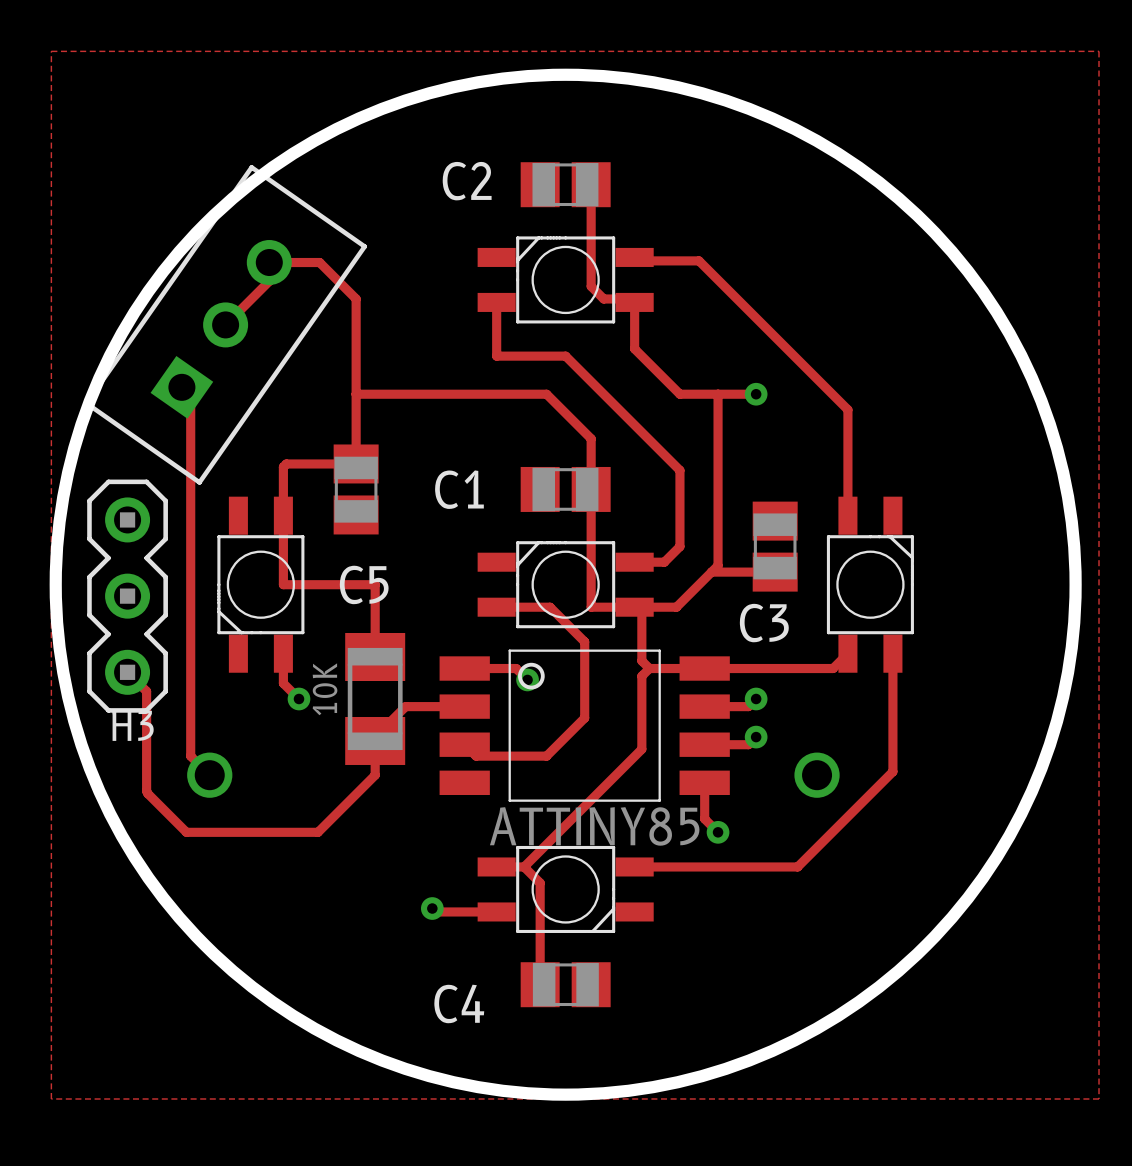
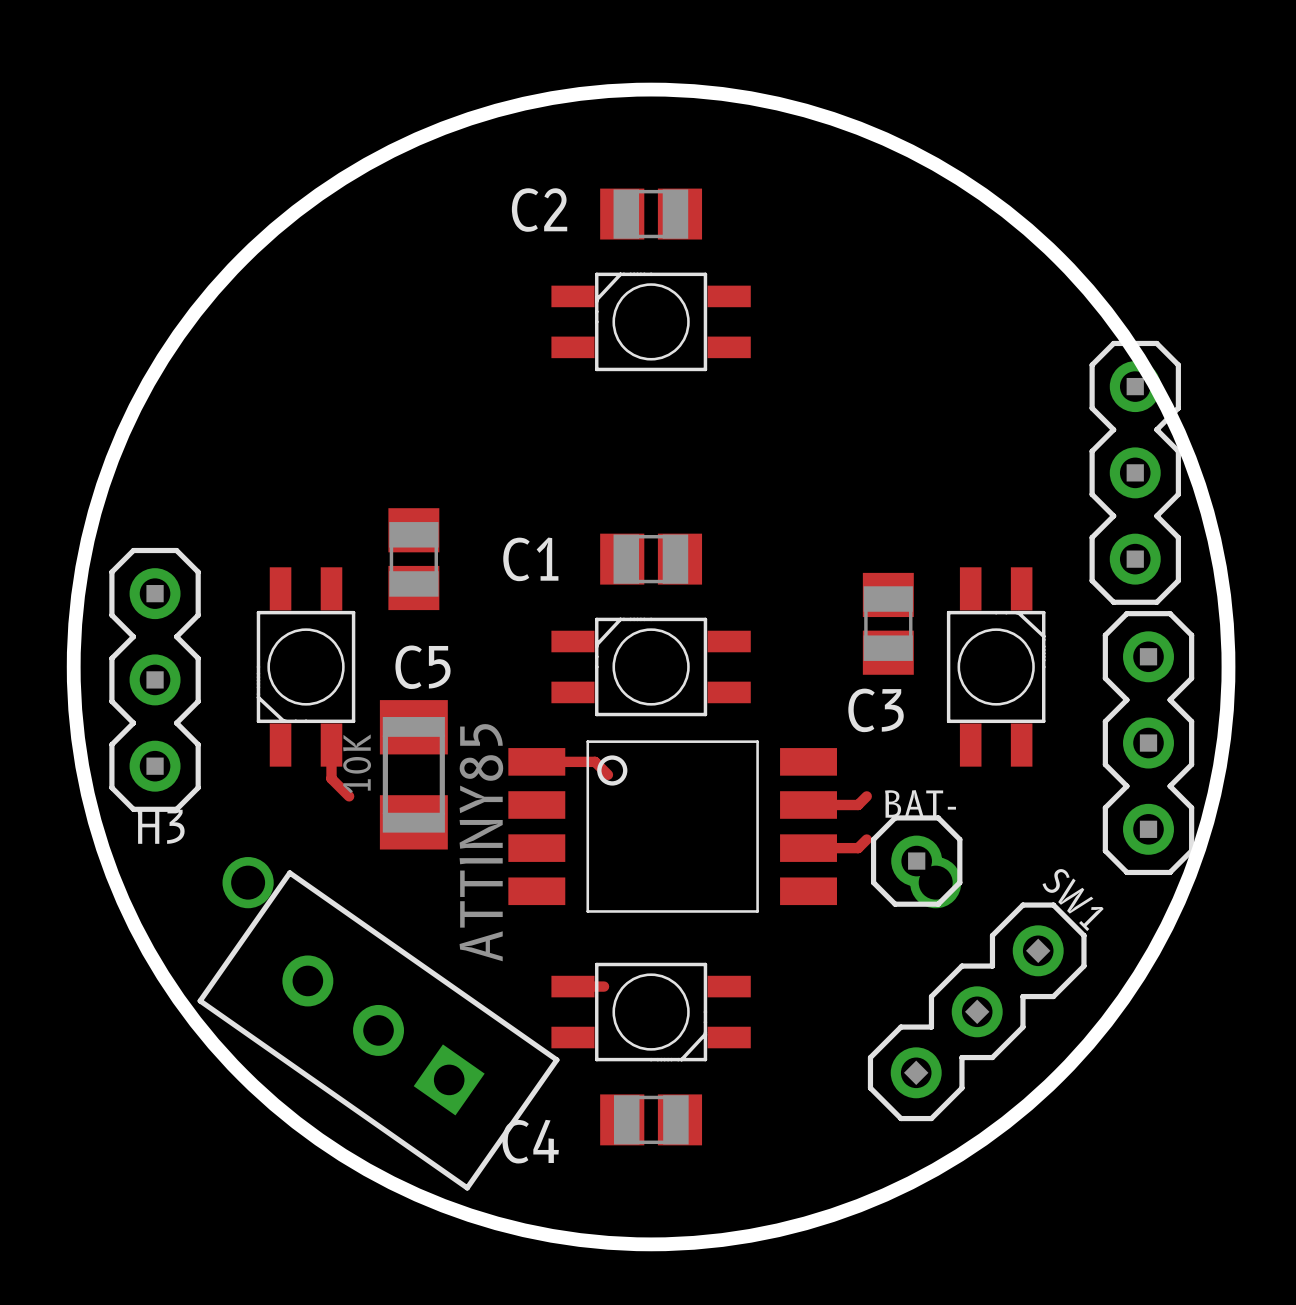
zone outline: (51, 51) (1099, 51) (1099, 1098) (51, 1098) (51, 51) -> none
track: (591, 184) (591, 286) (603, 298) (631, 298) -> none
track: (634, 257) (638, 260) (699, 260) (847, 409) (847, 515) -> none
track: (496, 302) (496, 356) (565, 356) (679, 470) (679, 546) (664, 562) (634, 562) -> none
track: (634, 302) (634, 348) (679, 394) (756, 394) -> none
track: (225, 324) (269, 281) (269, 262) (319, 262) (356, 298) (356, 463) (286, 463) (283, 466) (283, 584) (375, 584) (375, 657) -> none
part rotation: 0° (225, 324) -> 90° counterclockwise (378, 1030)
part position: (225, 324) -> (378, 1030)
track: (181, 387) (190, 396) (190, 756) (209, 775) -> none
track: (356, 394) (546, 394) (591, 438) (591, 607) (676, 607) (718, 565) (718, 394) -> none
via: (756, 394) -> none
part: none -> (1135, 472)
track: (711, 572) (775, 572) -> none
track: (496, 607) (550, 607) (584, 641) (584, 718) (546, 756) (476, 756) (464, 744) -> none
track: (641, 607) (641, 660) (649, 668) -> none
part: none -> (1148, 743)
track: (847, 653) (833, 668) (649, 668) -> none
track: (892, 653) (892, 771) (797, 866) (638, 866) -> none
track: (649, 668) (641, 676) (641, 749) (524, 866) (540, 883) (540, 984) -> none
track: (127, 672) (146, 691) (146, 791) (186, 832) (318, 832) (375, 775) (375, 737) (405, 706) (464, 706) -> none
via: (527, 679) -> none
via: (298, 698) -> none
part position: (375, 698) -> (413, 774)
via: (756, 698) -> none
via: (756, 737) -> none
BAT-: none -> (916, 861)
track: (704, 782) (704, 818) (718, 832) -> none
part value rotation: 0° (594, 826) -> 90° counterclockwise (481, 842)
via: (718, 832) -> none
SW1: none -> (977, 1011)
track: (432, 908) (435, 911) (496, 911) -> none
via: (432, 908) -> none

